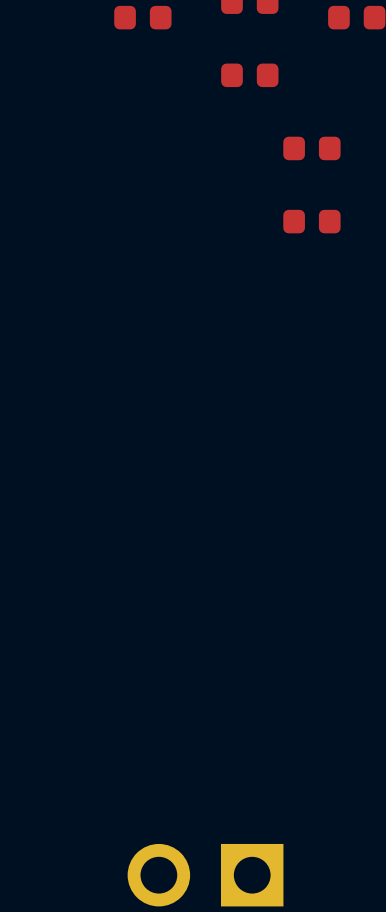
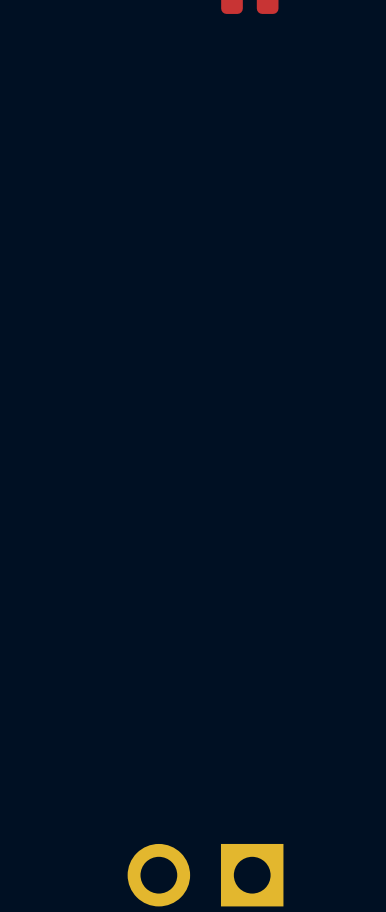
part: (142, 17) -> none
part: (356, 17) -> none
part: (249, 75) -> none
part: (311, 148) -> none
part: (311, 221) -> none

